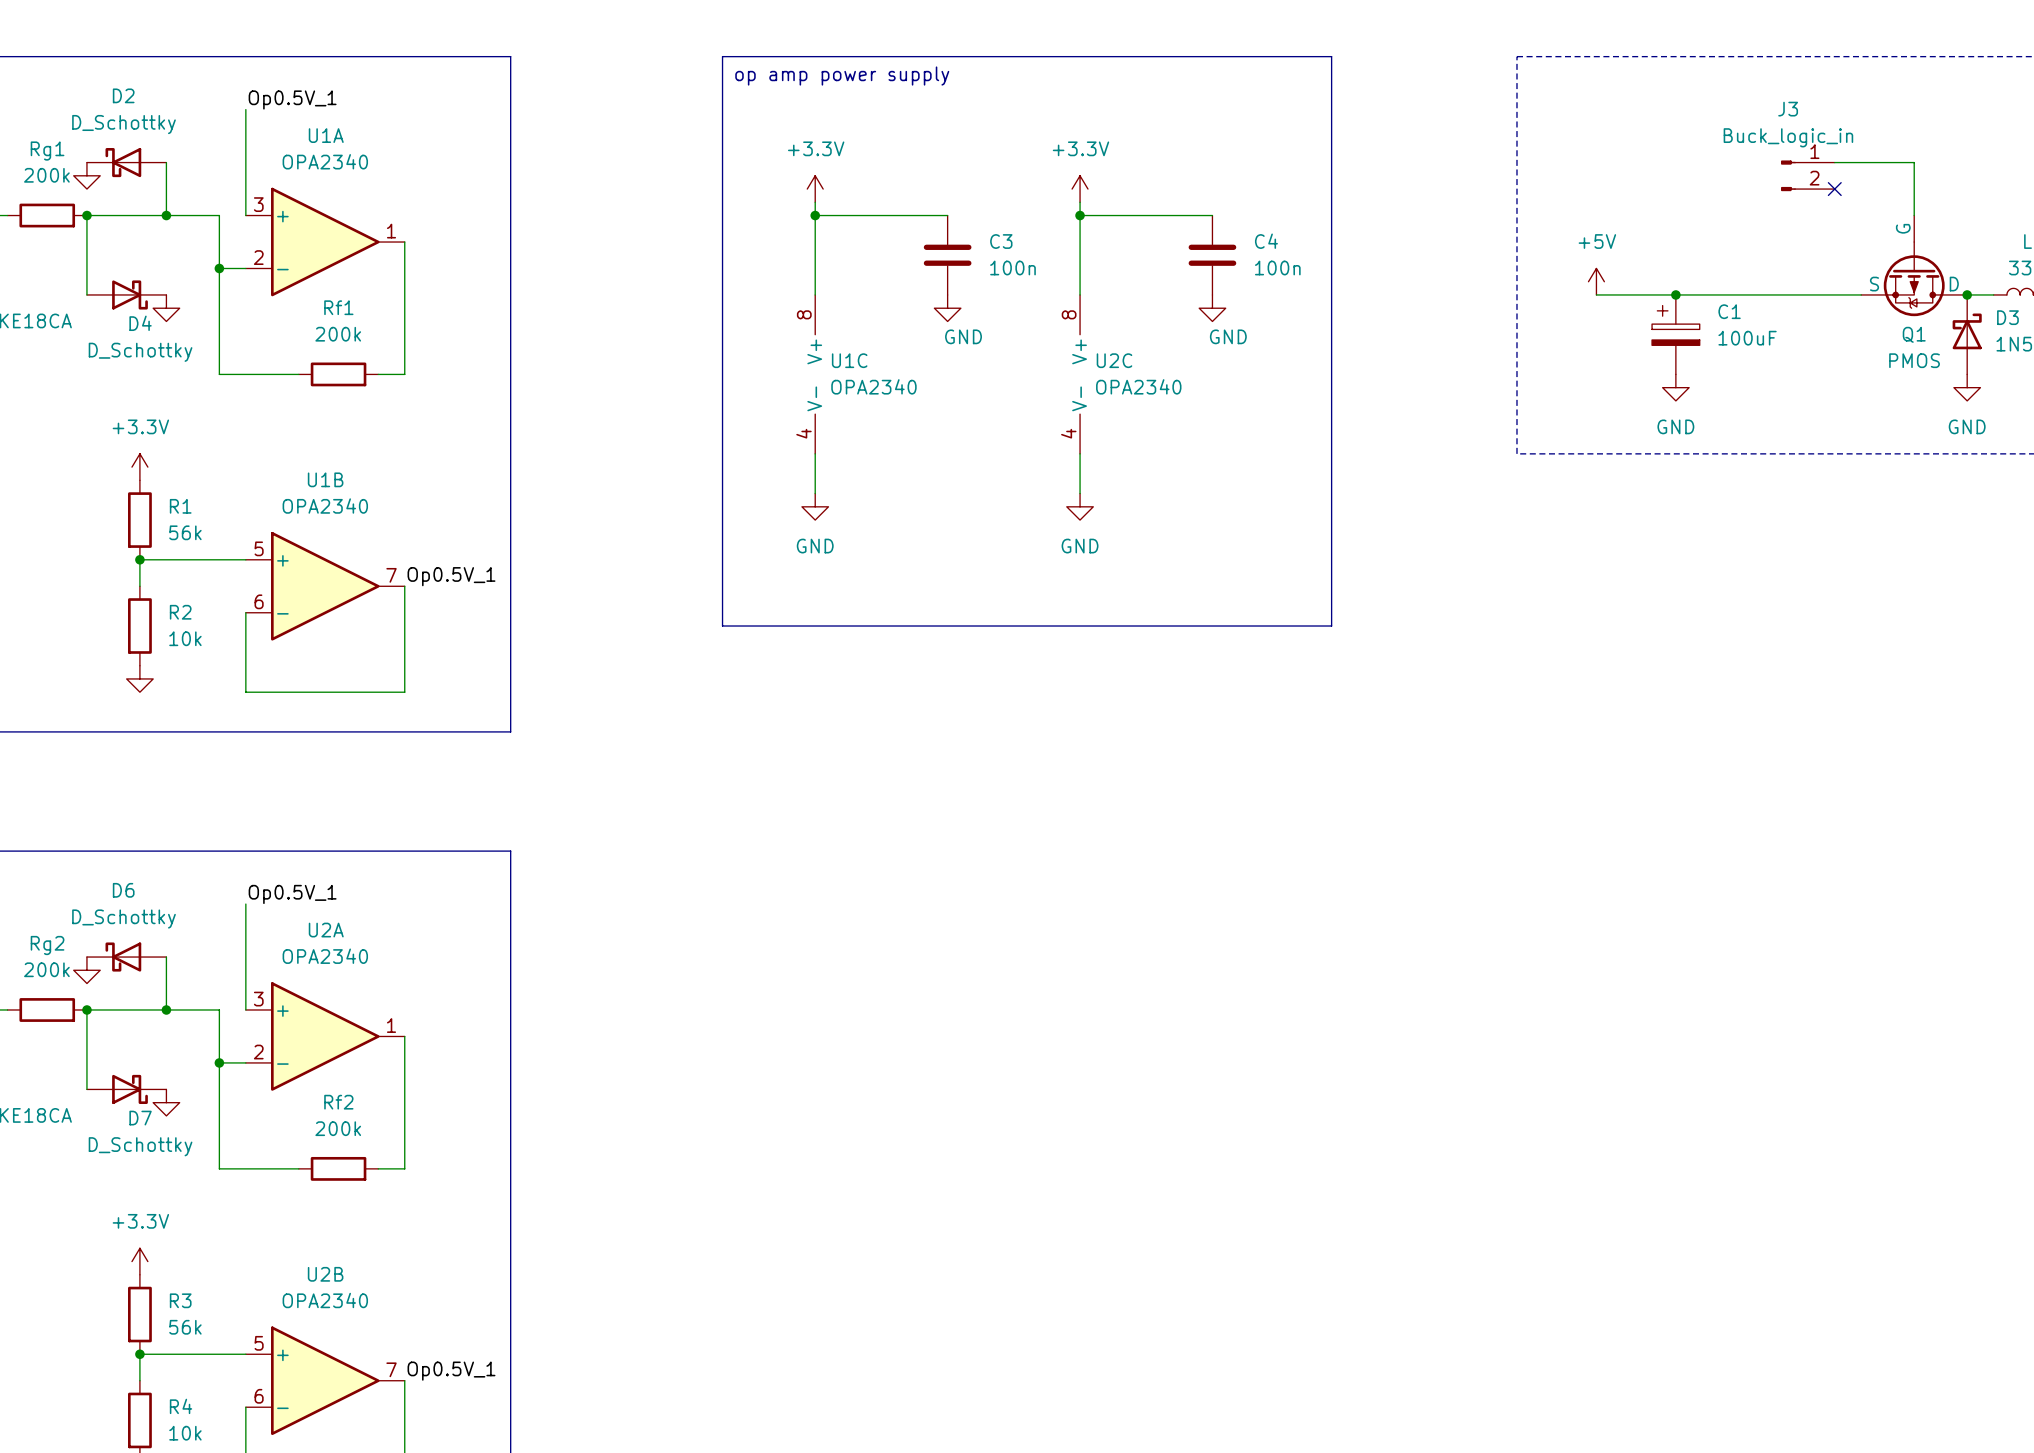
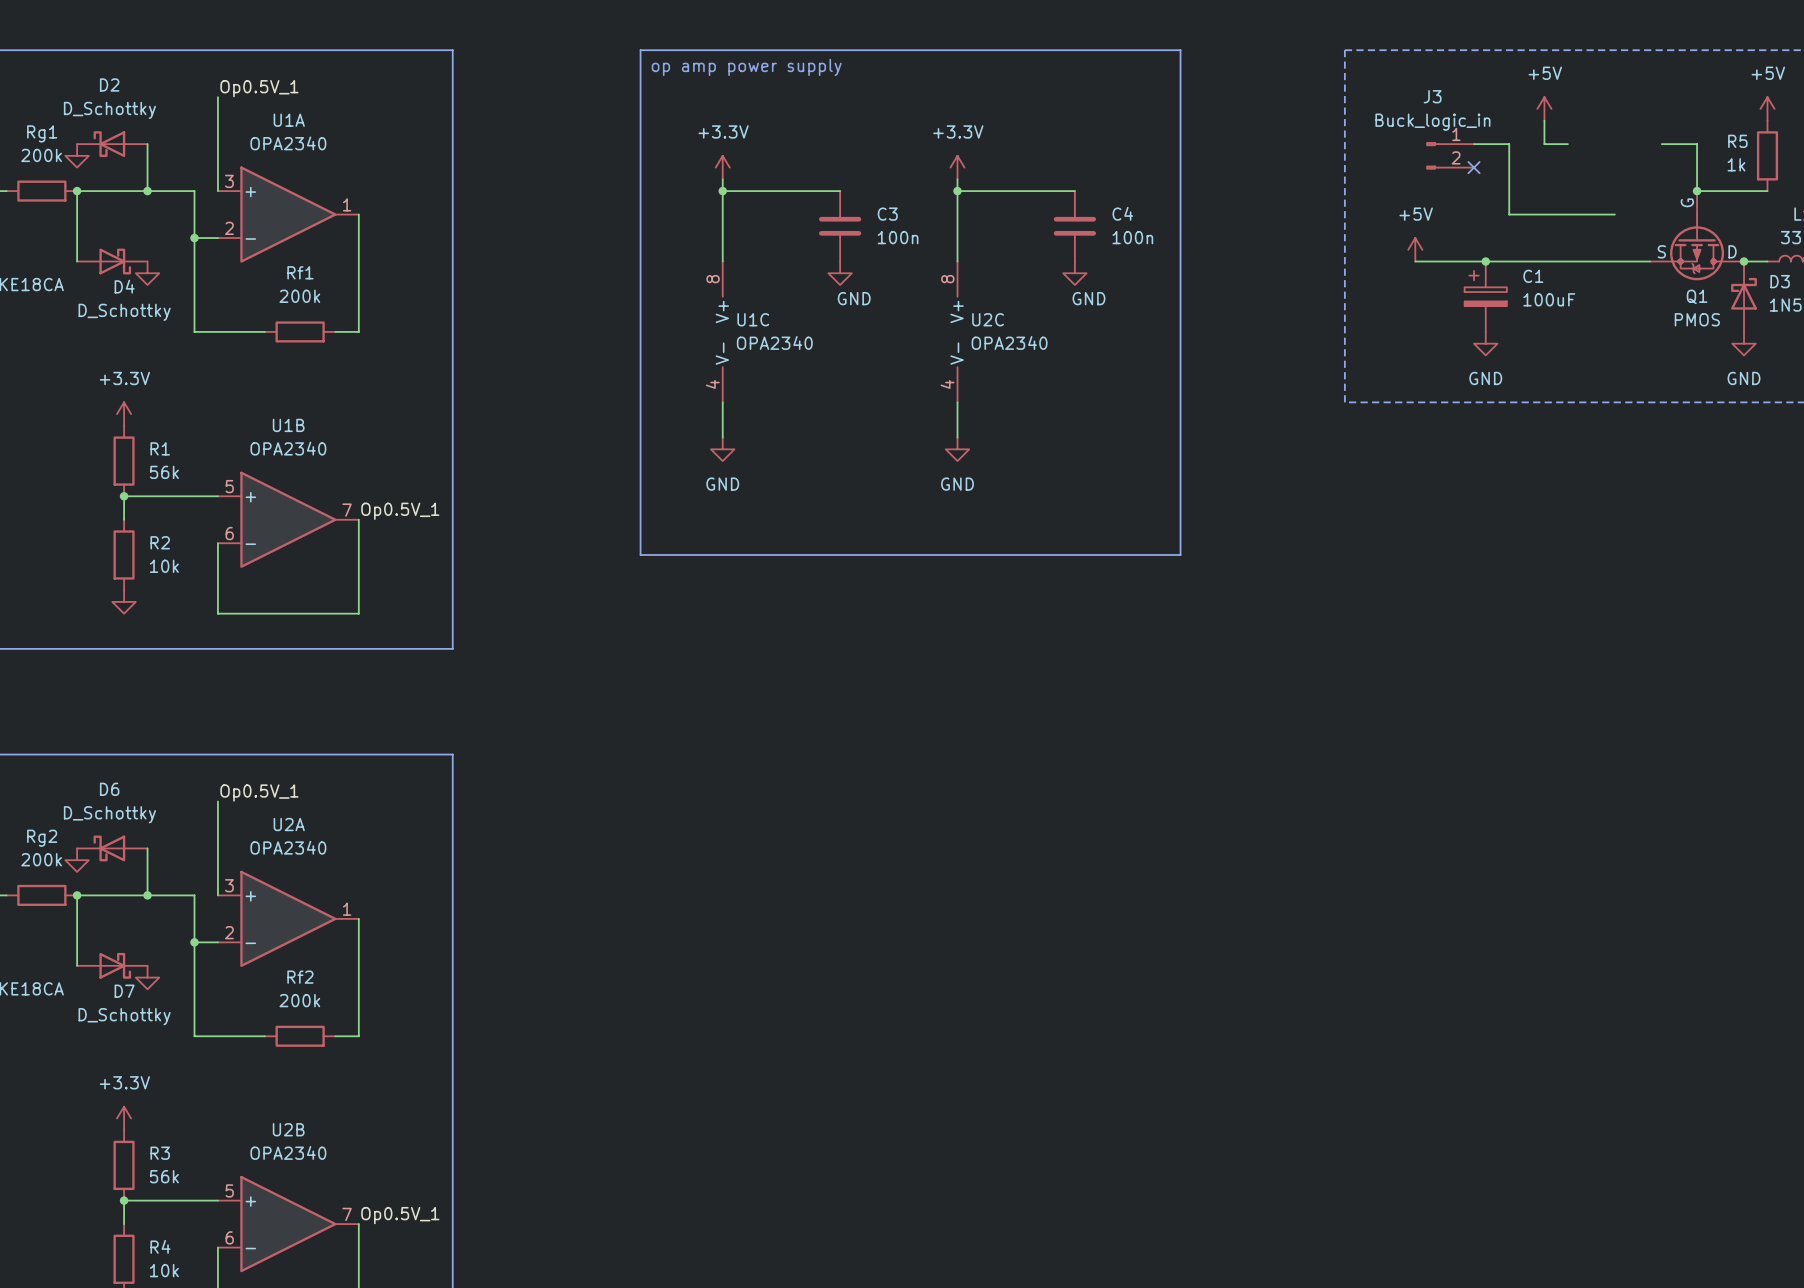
power symbol: none -> +5V (1544, 108)
power symbol: none -> +5V (1767, 108)
wire: none -> (1544, 120) (1544, 144) (1567, 144)
wire: none -> (1474, 144) (1509, 144) (1509, 214) (1614, 214)
wire: (1834, 162) (1874, 162) -> none
J3 position: (1807, 175) -> (1450, 155)
R5: none -> 1k (1767, 155)
no-connect mark: none -> (1474, 167)
no-connect mark: (1834, 189) -> none
wire: none -> (1697, 191) (1767, 191)
junction: none -> (1697, 191)

